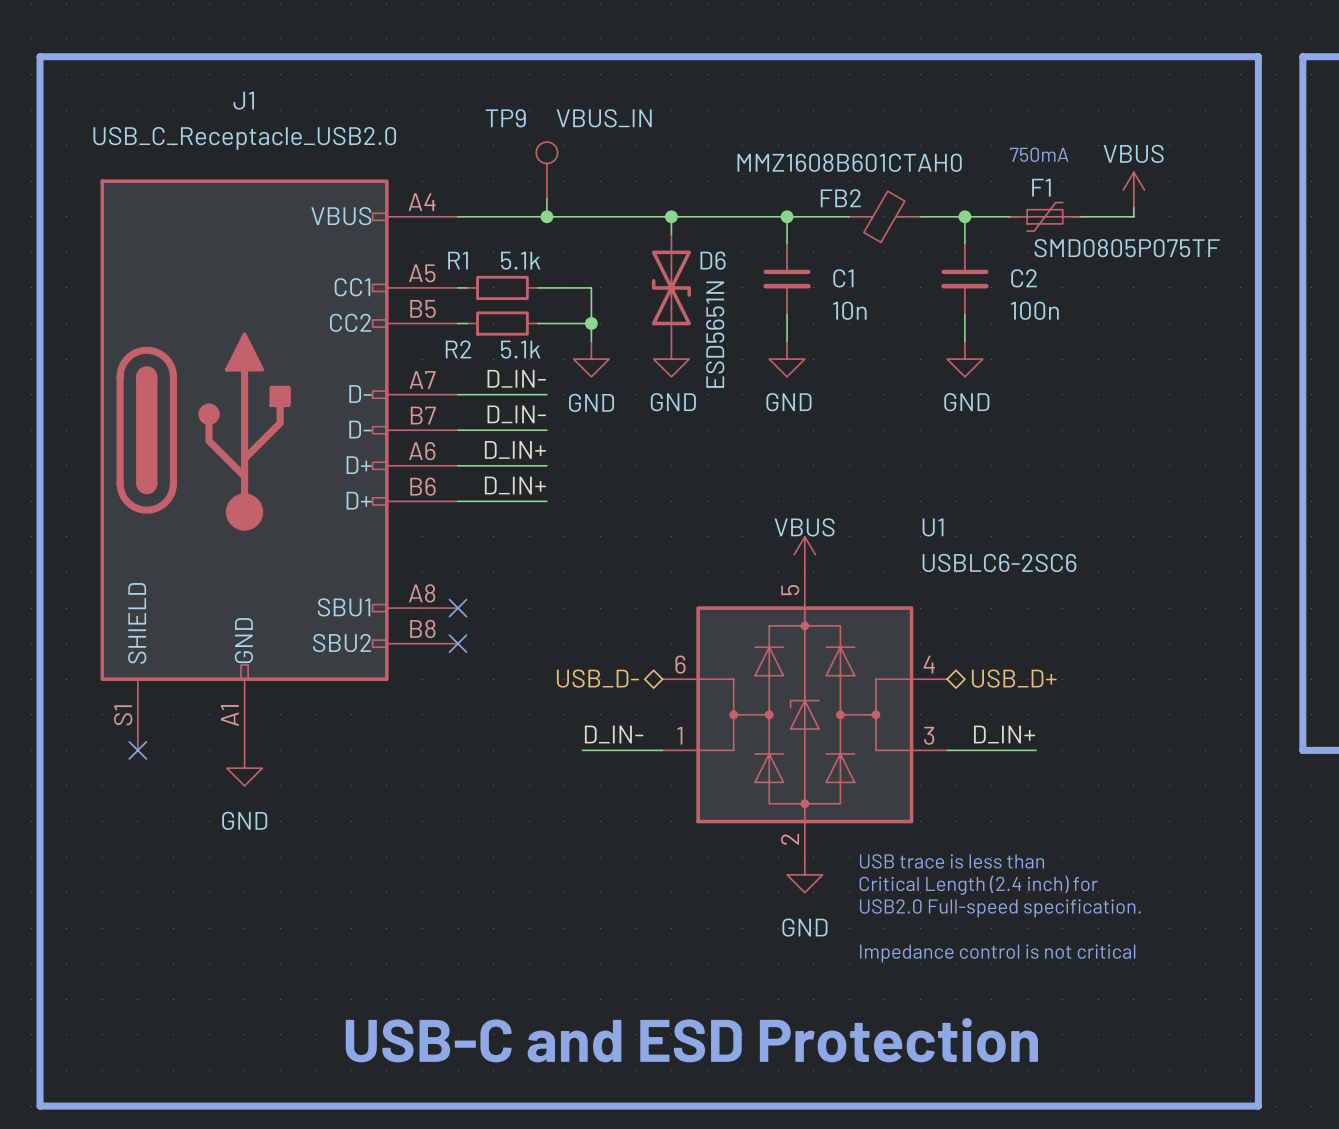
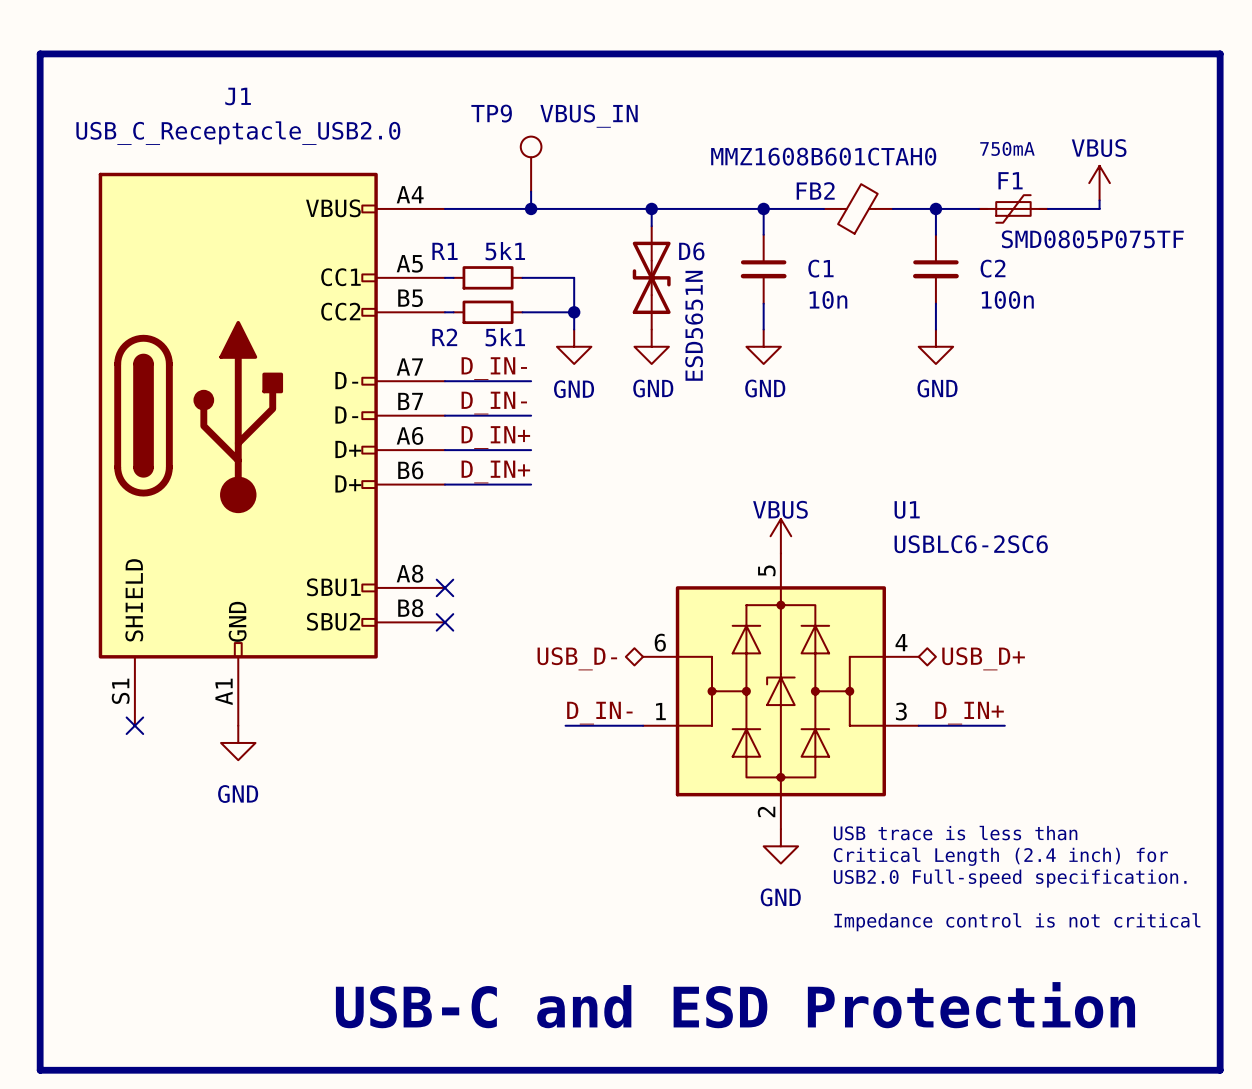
R1 value: 5.1k (520, 260) -> 5k1 (505, 251)
R2 value: 5.1k (520, 349) -> 5k1 (505, 337)

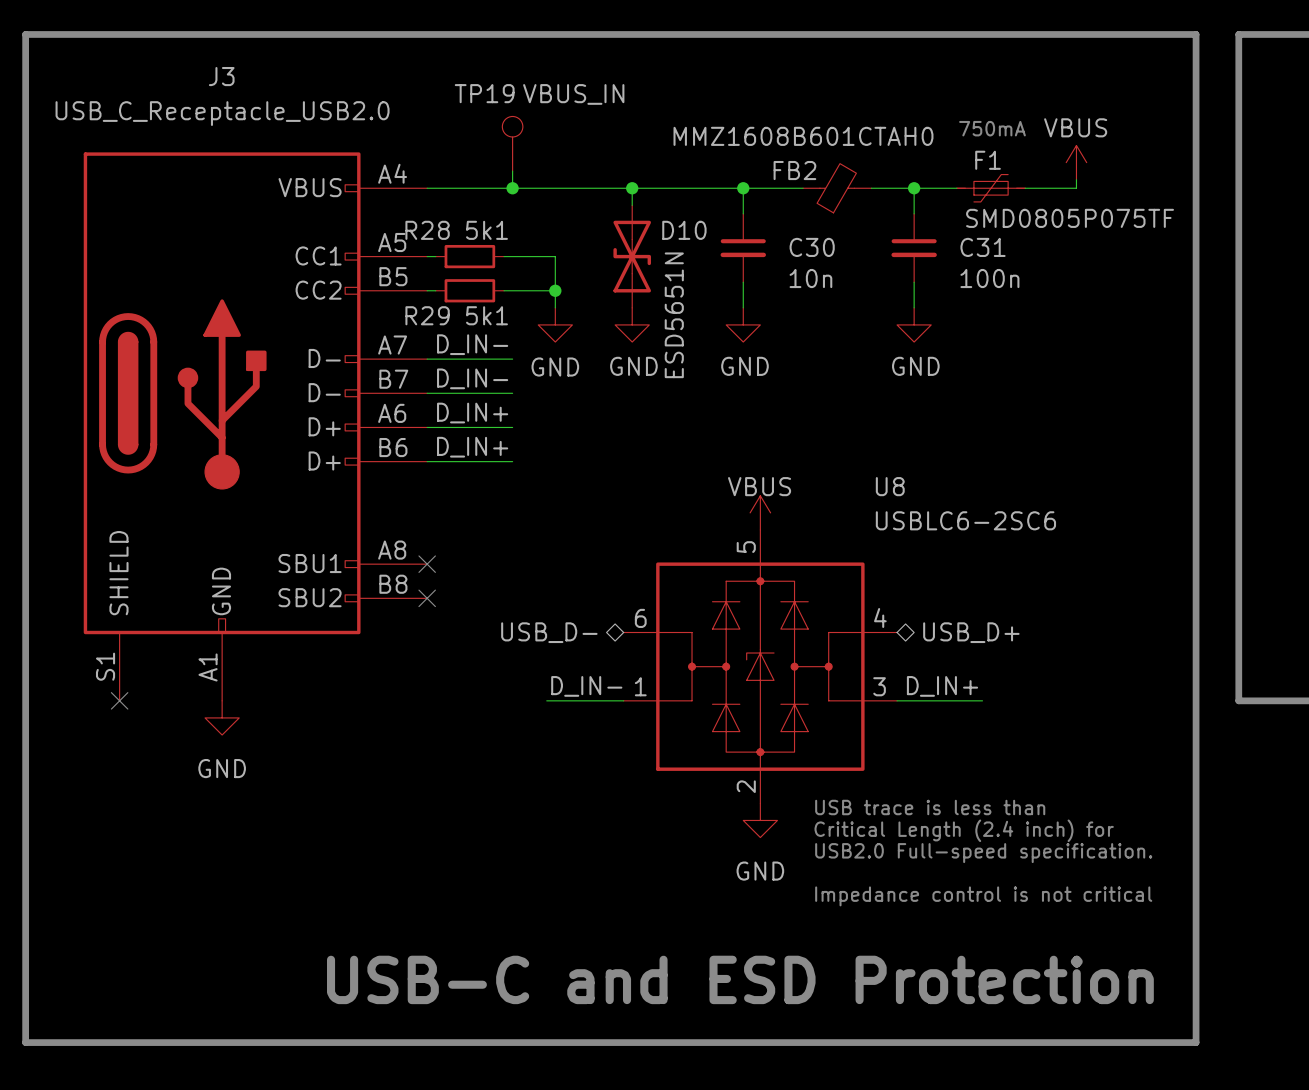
J1 name: J1 (238, 96) -> J3 (221, 76)
TP9 name: TP9 (491, 113) -> TP19 (484, 93)
R1 name: R1 (445, 251) -> R28 (427, 230)
D6 name: D6 (691, 251) -> D10 (684, 230)
C1 name: C1 (820, 268) -> C30 (812, 247)
C2 name: C2 (993, 268) -> C31 (983, 247)
R2 name: R2 (444, 337) -> R29 (427, 315)
U1 name: U1 (907, 509) -> U8 (890, 486)

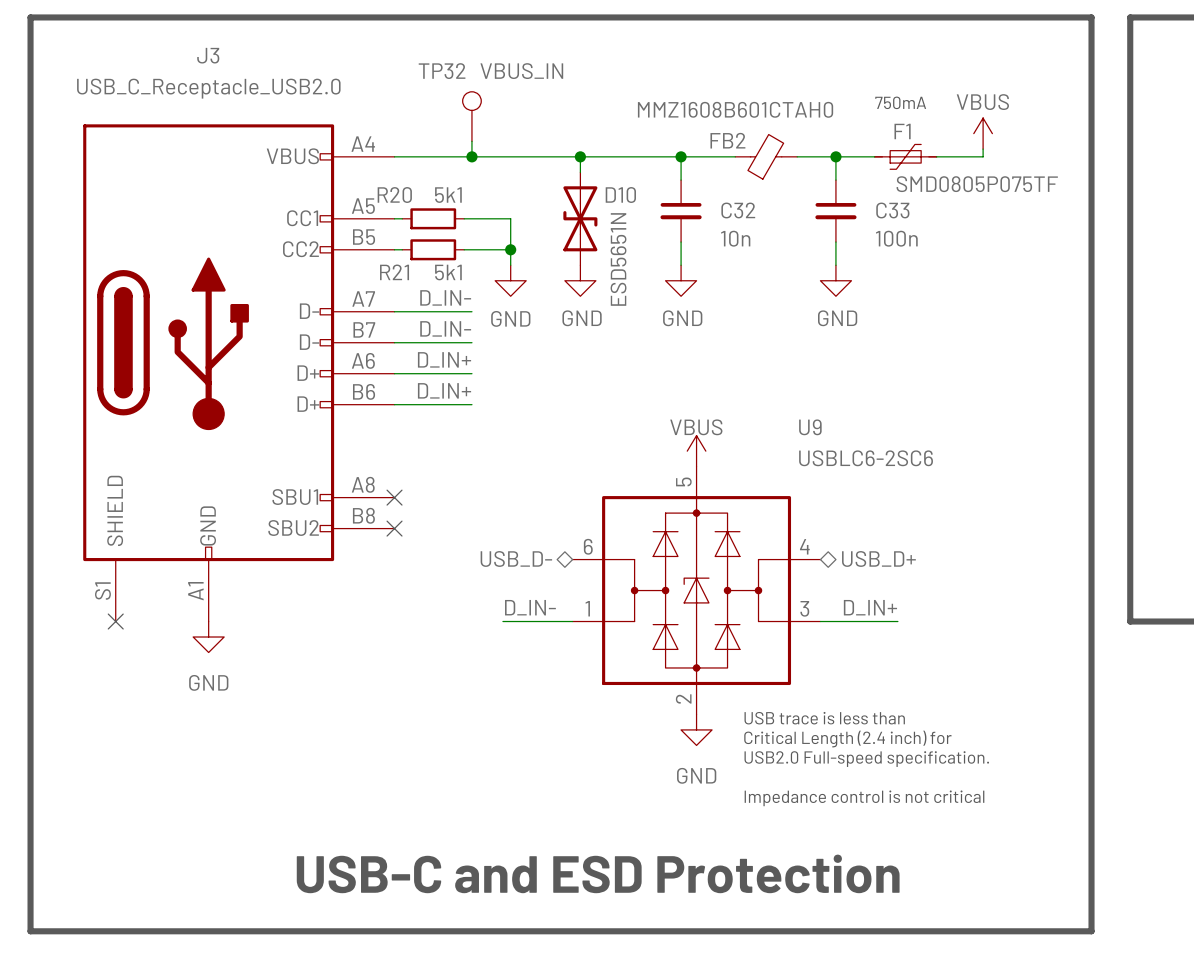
TP19 name: TP19 (484, 93) -> TP32 (442, 71)
R28 name: R28 (427, 230) -> R20 (394, 195)
C30 name: C30 (812, 247) -> C32 (738, 210)
C31 name: C31 (983, 247) -> C33 (892, 210)
R29 name: R29 (427, 315) -> R21 (394, 272)
U8 name: U8 (890, 486) -> U9 (810, 427)

